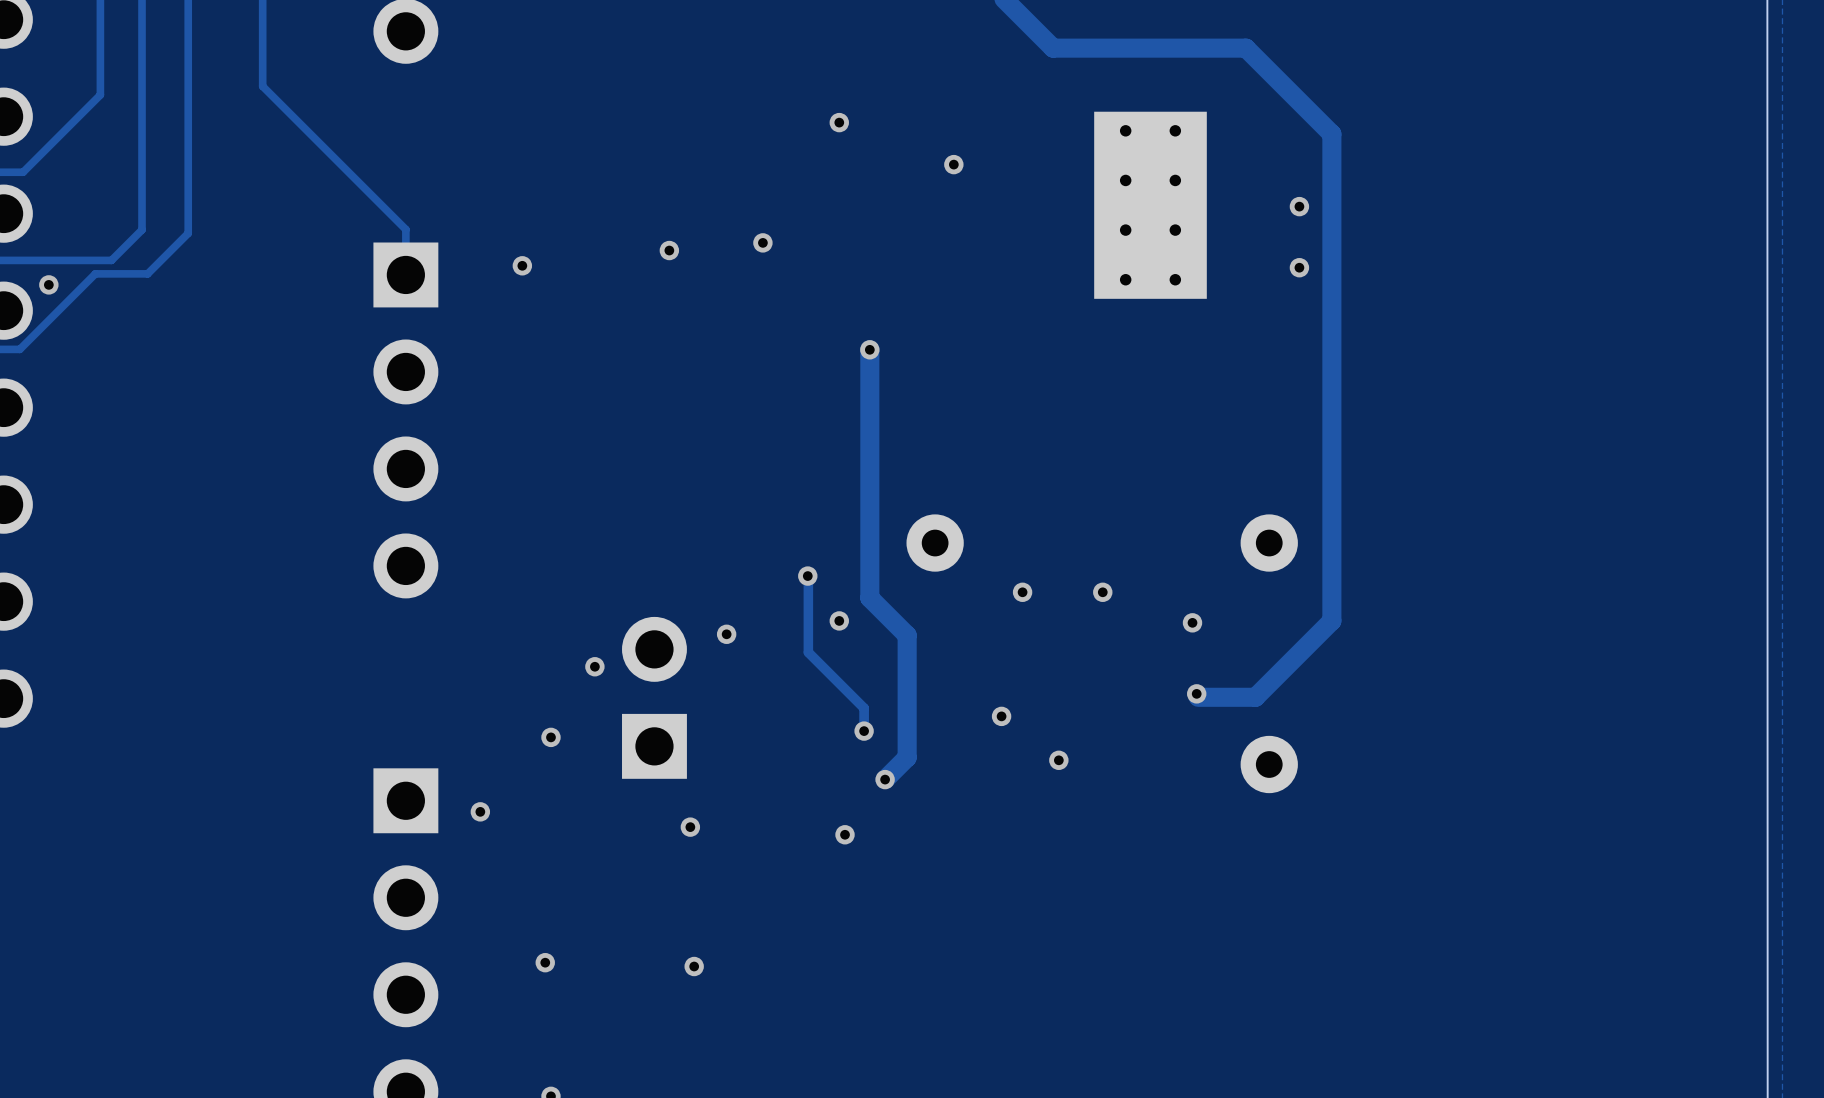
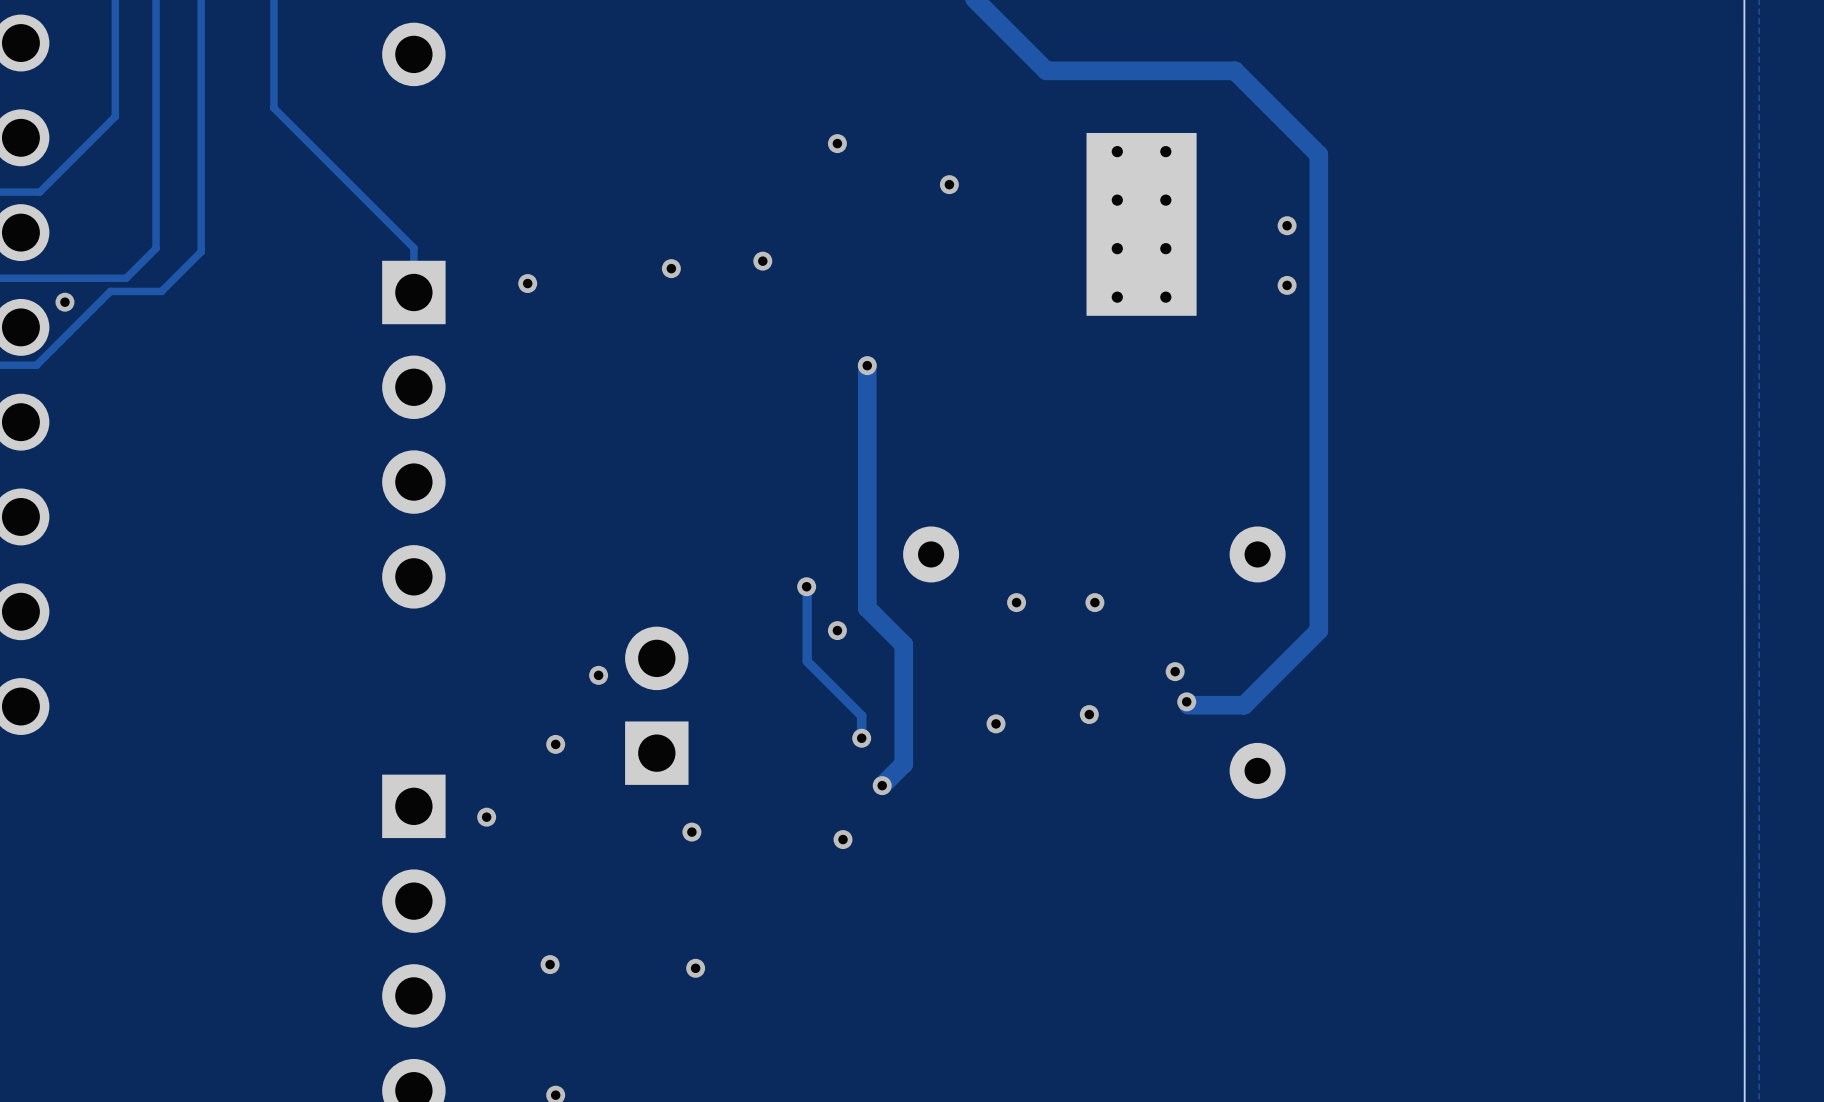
via position: (1192, 622) -> (1175, 671)
via: (726, 634) -> none
via: none -> (1089, 714)
via: (1058, 760) -> none

